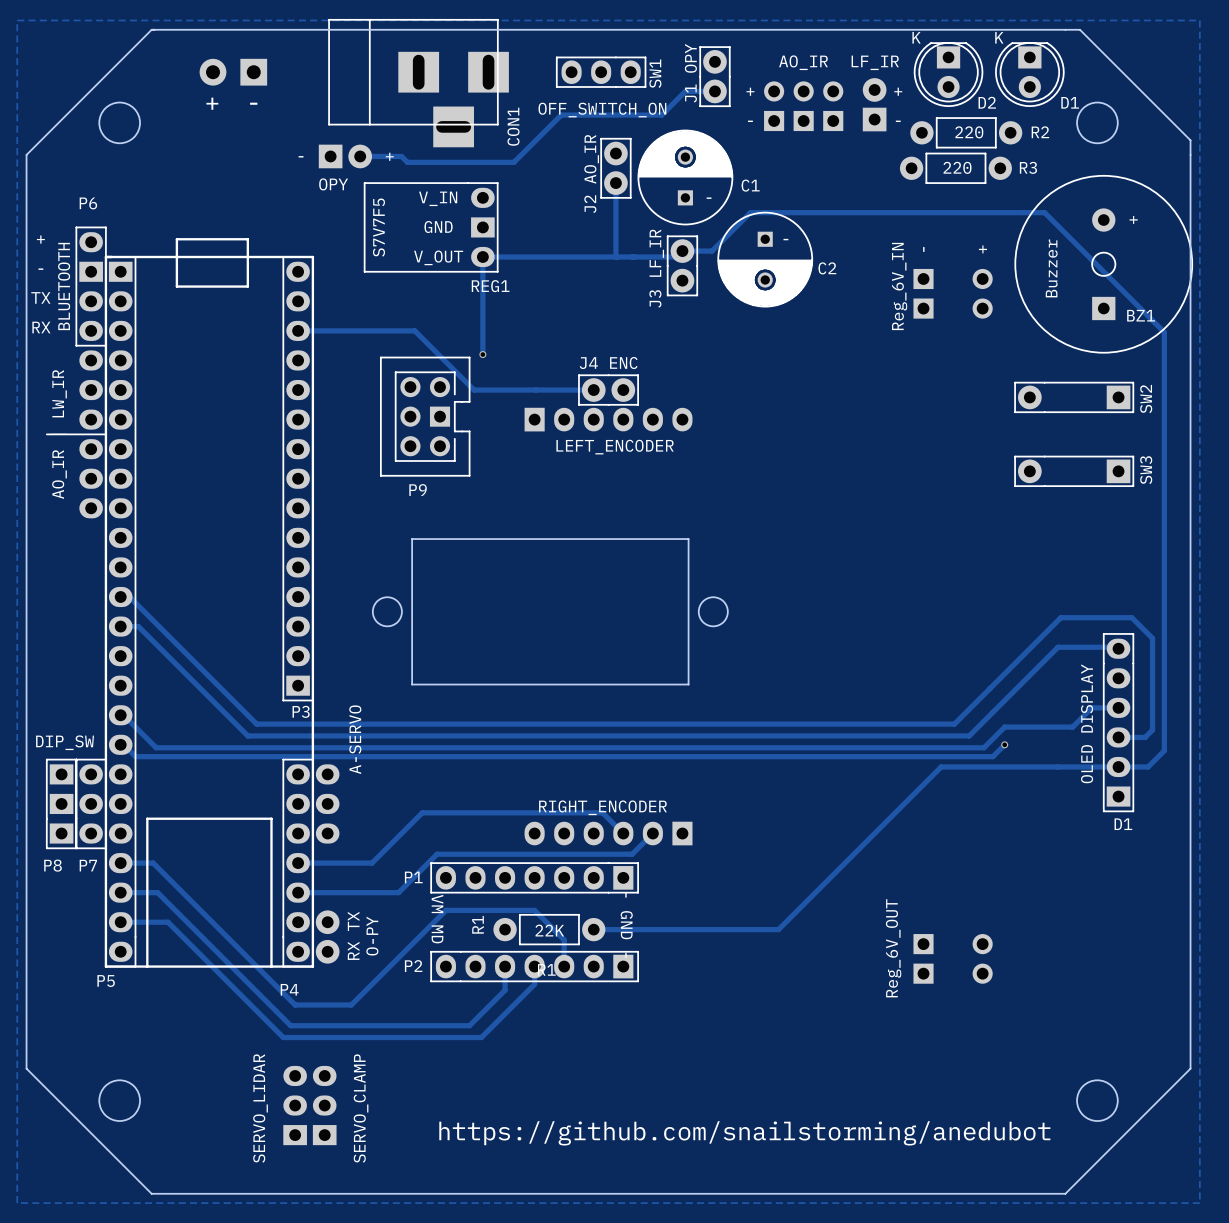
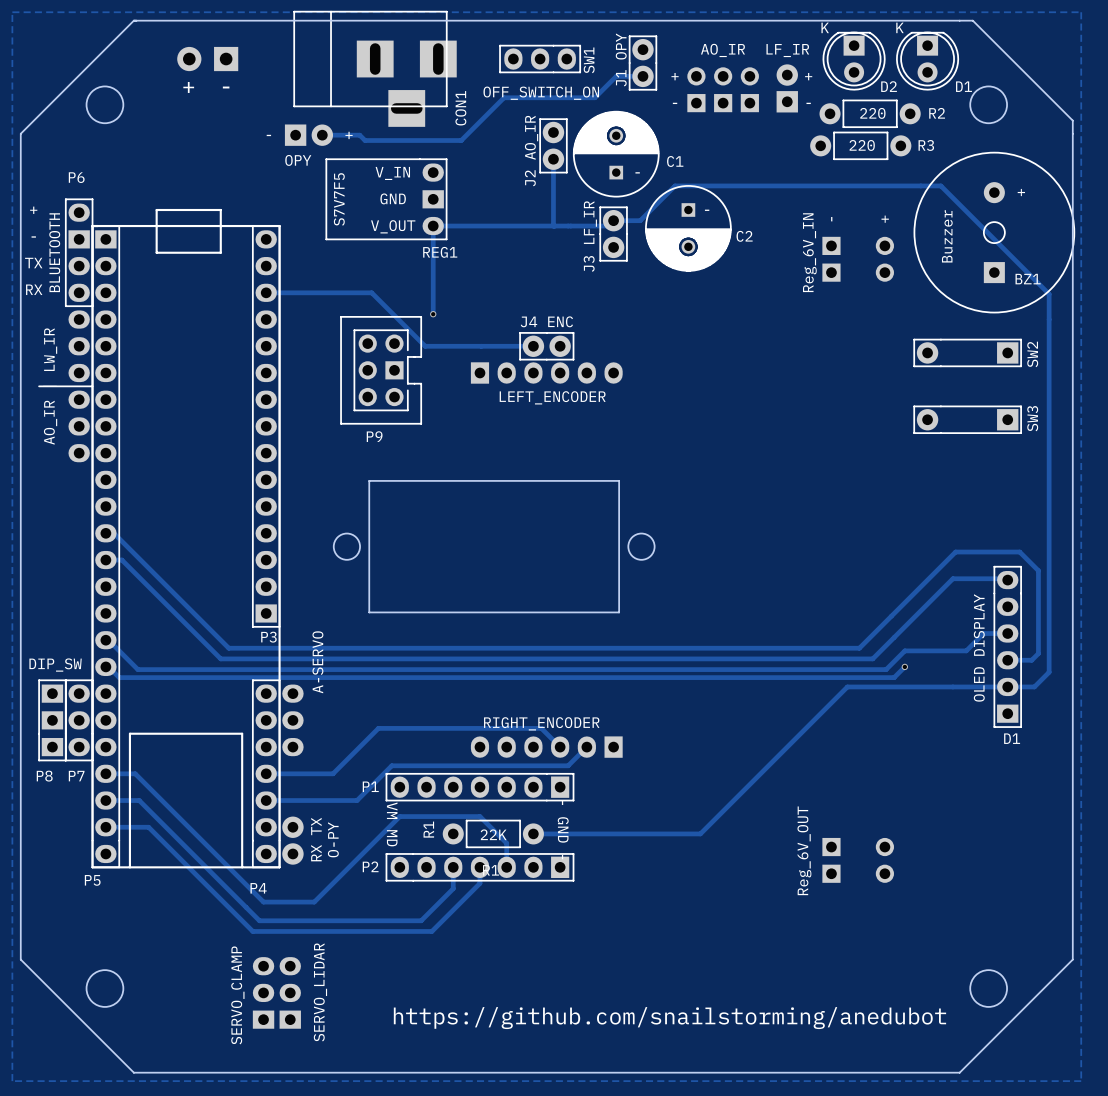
part value position: SERVO_LIDAR (260, 1108) -> SERVO_LIDAR (320, 992)
part value position: SERVO_CLAMP (361, 1108) -> SERVO_CLAMP (237, 995)

